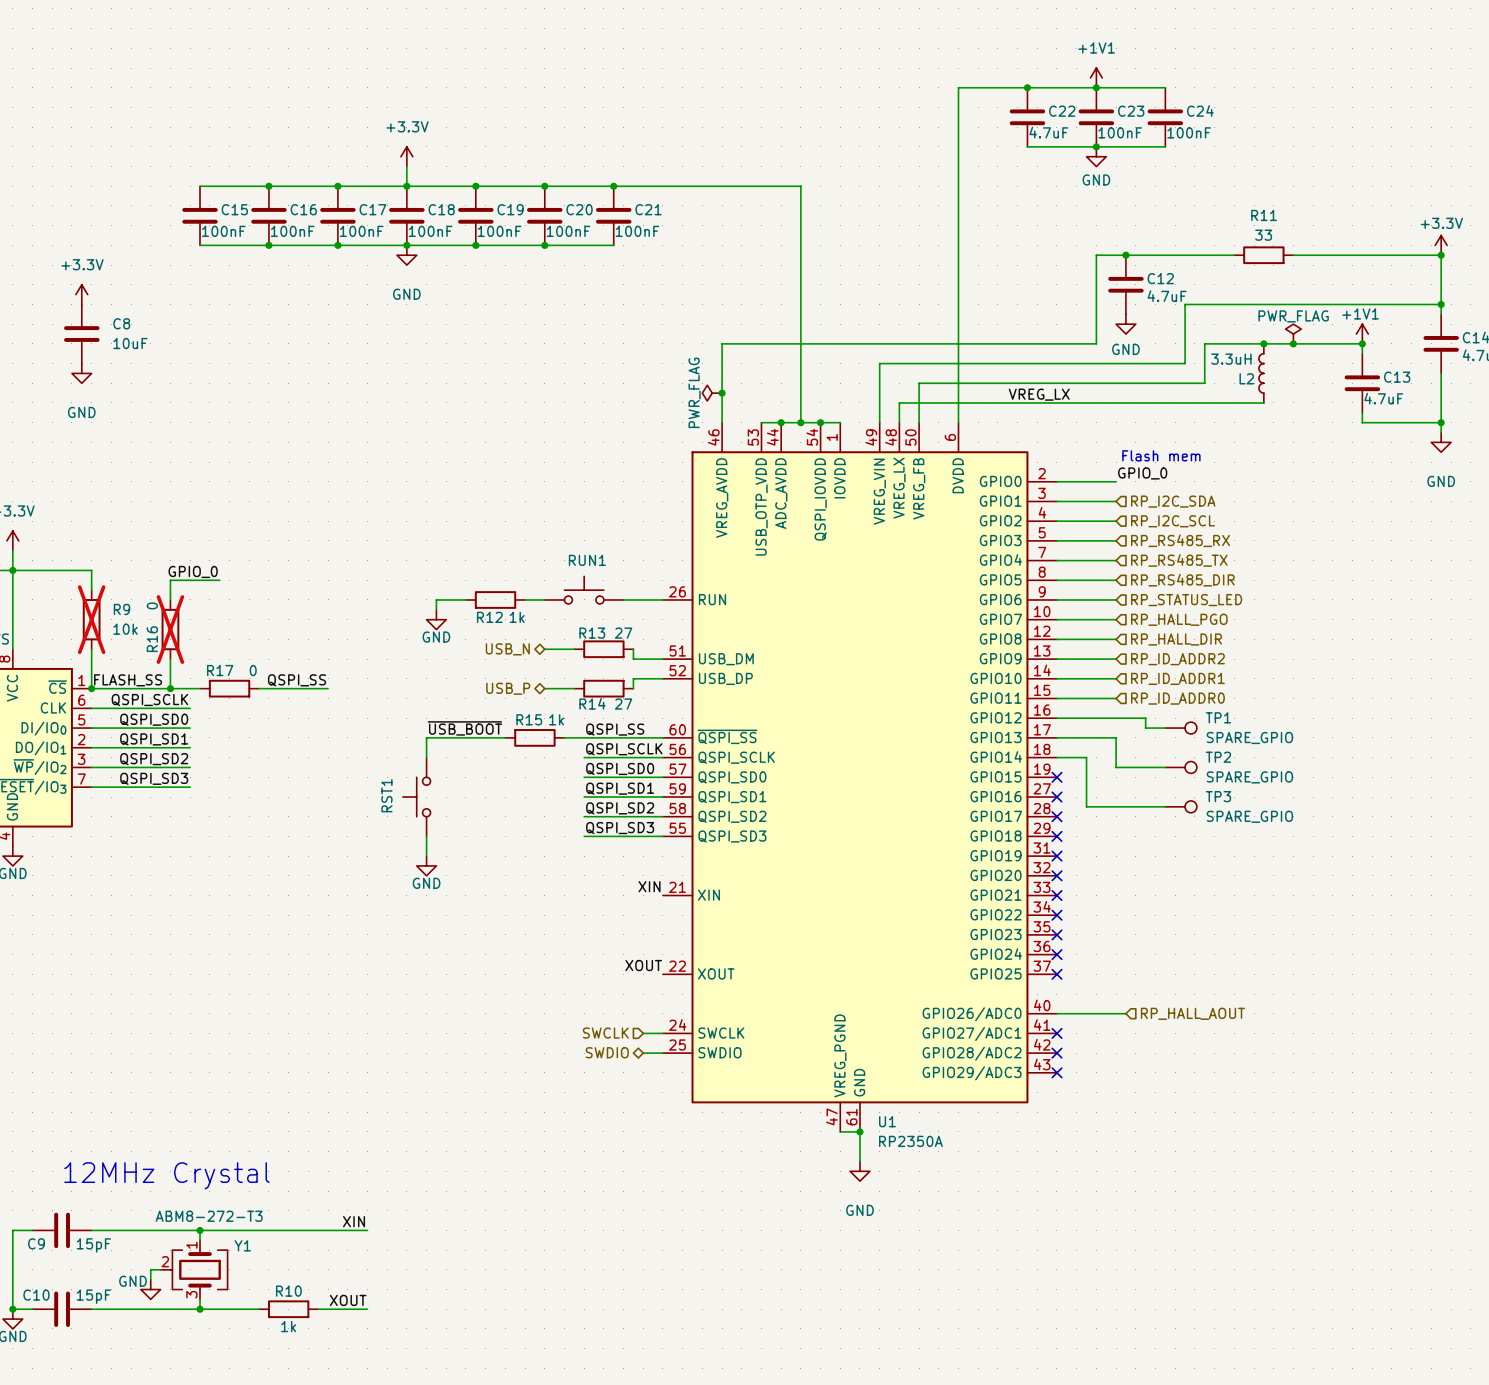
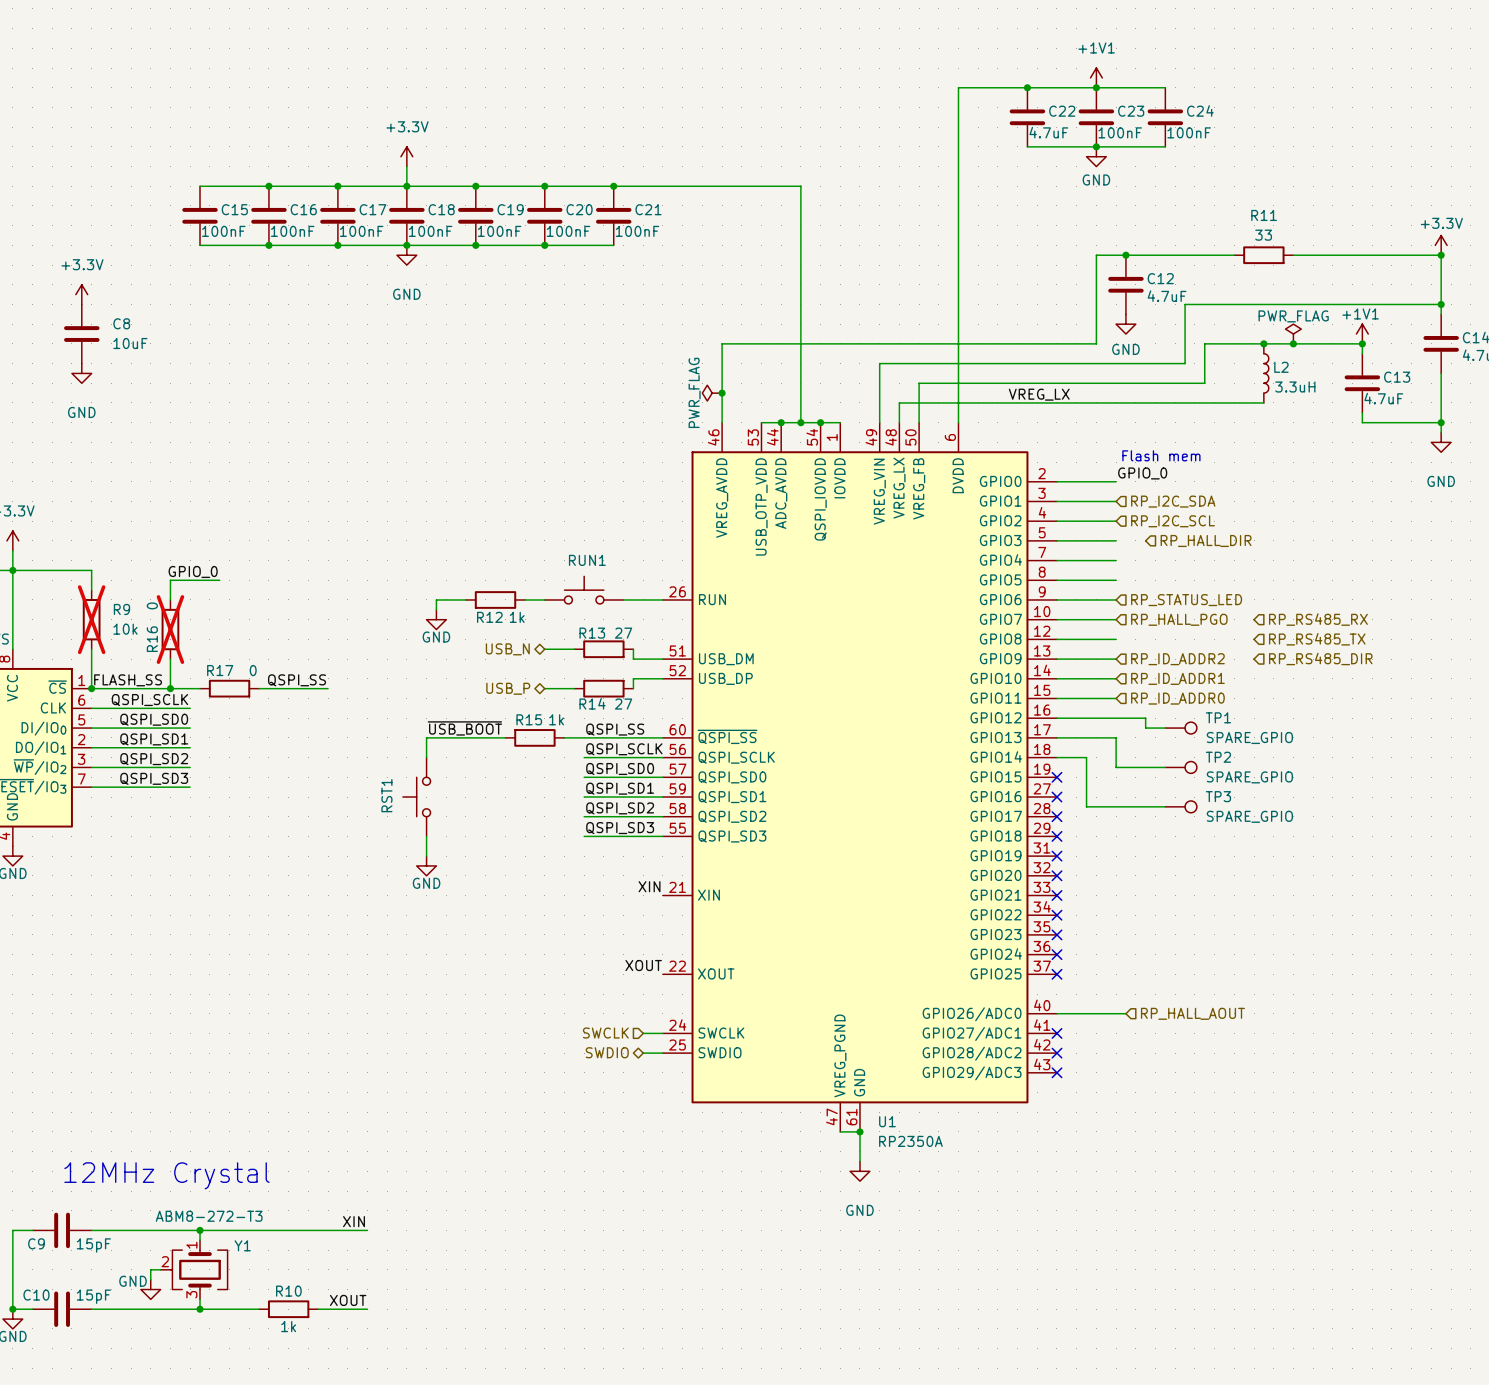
L2 rotation: 0° (1261, 373) -> 180° (1266, 373)
hierarchical label position: RP_RS485_RX (1180, 540) -> RP_RS485_RX (1318, 619)
hierarchical label position: RP_RS485_TX (1179, 560) -> RP_RS485_TX (1317, 639)
hierarchical label position: RP_RS485_DIR (1182, 580) -> RP_RS485_DIR (1320, 658)
hierarchical label position: RP_HALL_DIR (1176, 639) -> RP_HALL_DIR (1206, 540)

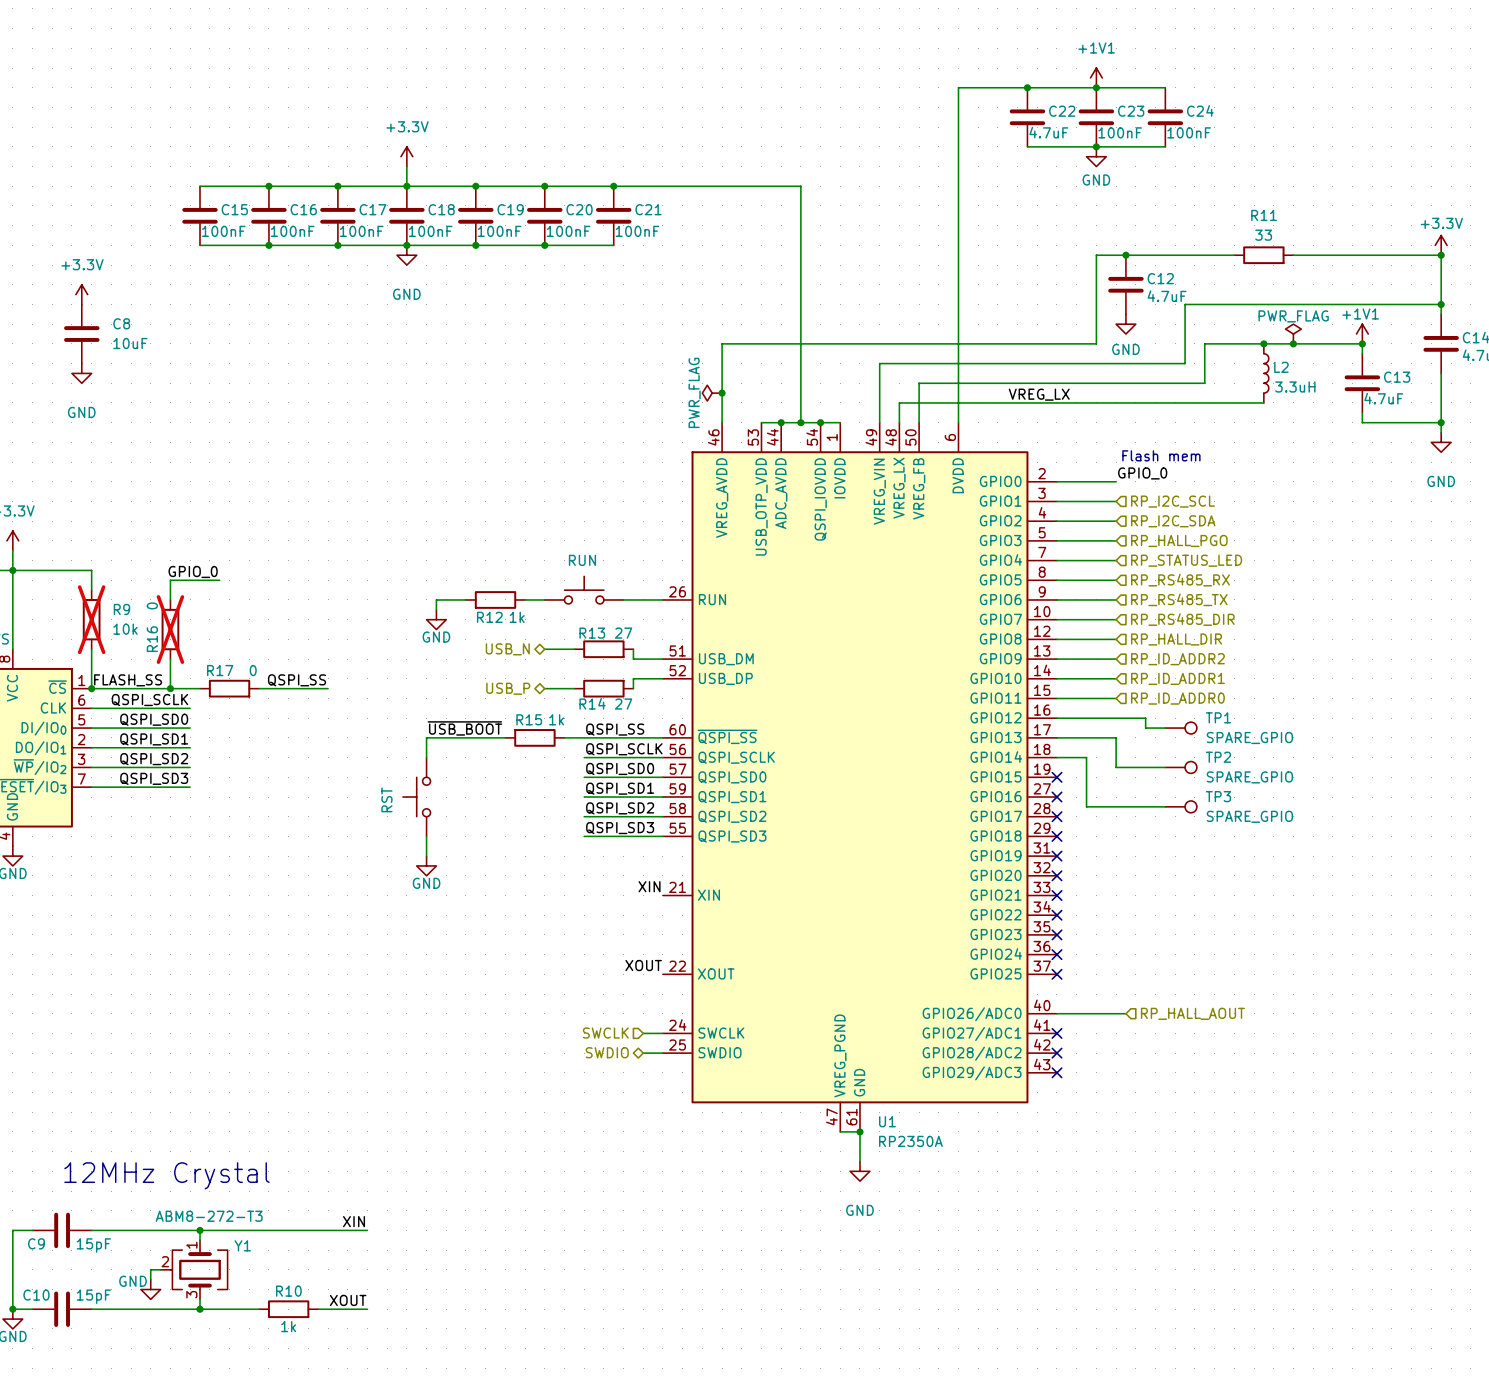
hierarchical label: RP_I2C_SDA (1173, 501) -> RP_I2C_SCL (1173, 501)
hierarchical label: RP_I2C_SCL (1173, 521) -> RP_I2C_SDA (1173, 521)
hierarchical label: none -> RP_HALL_PGO (1179, 540)
hierarchical label position: RP_HALL_DIR (1206, 540) -> RP_HALL_DIR (1176, 639)
RUN1 name: RUN1 (587, 560) -> RUN (582, 560)
hierarchical label: none -> RP_STATUS_LED (1186, 560)
hierarchical label: RP_STATUS_LED (1186, 600) -> RP_RS485_TX (1179, 599)
hierarchical label: RP_HALL_PGO (1179, 619) -> RP_RS485_DIR (1182, 619)
hierarchical label position: RP_RS485_RX (1318, 619) -> RP_RS485_RX (1180, 580)
hierarchical label: RP_RS485_TX (1317, 639) -> none
hierarchical label: RP_RS485_DIR (1320, 658) -> none
RST1 name: RST1 (386, 795) -> RST (386, 799)

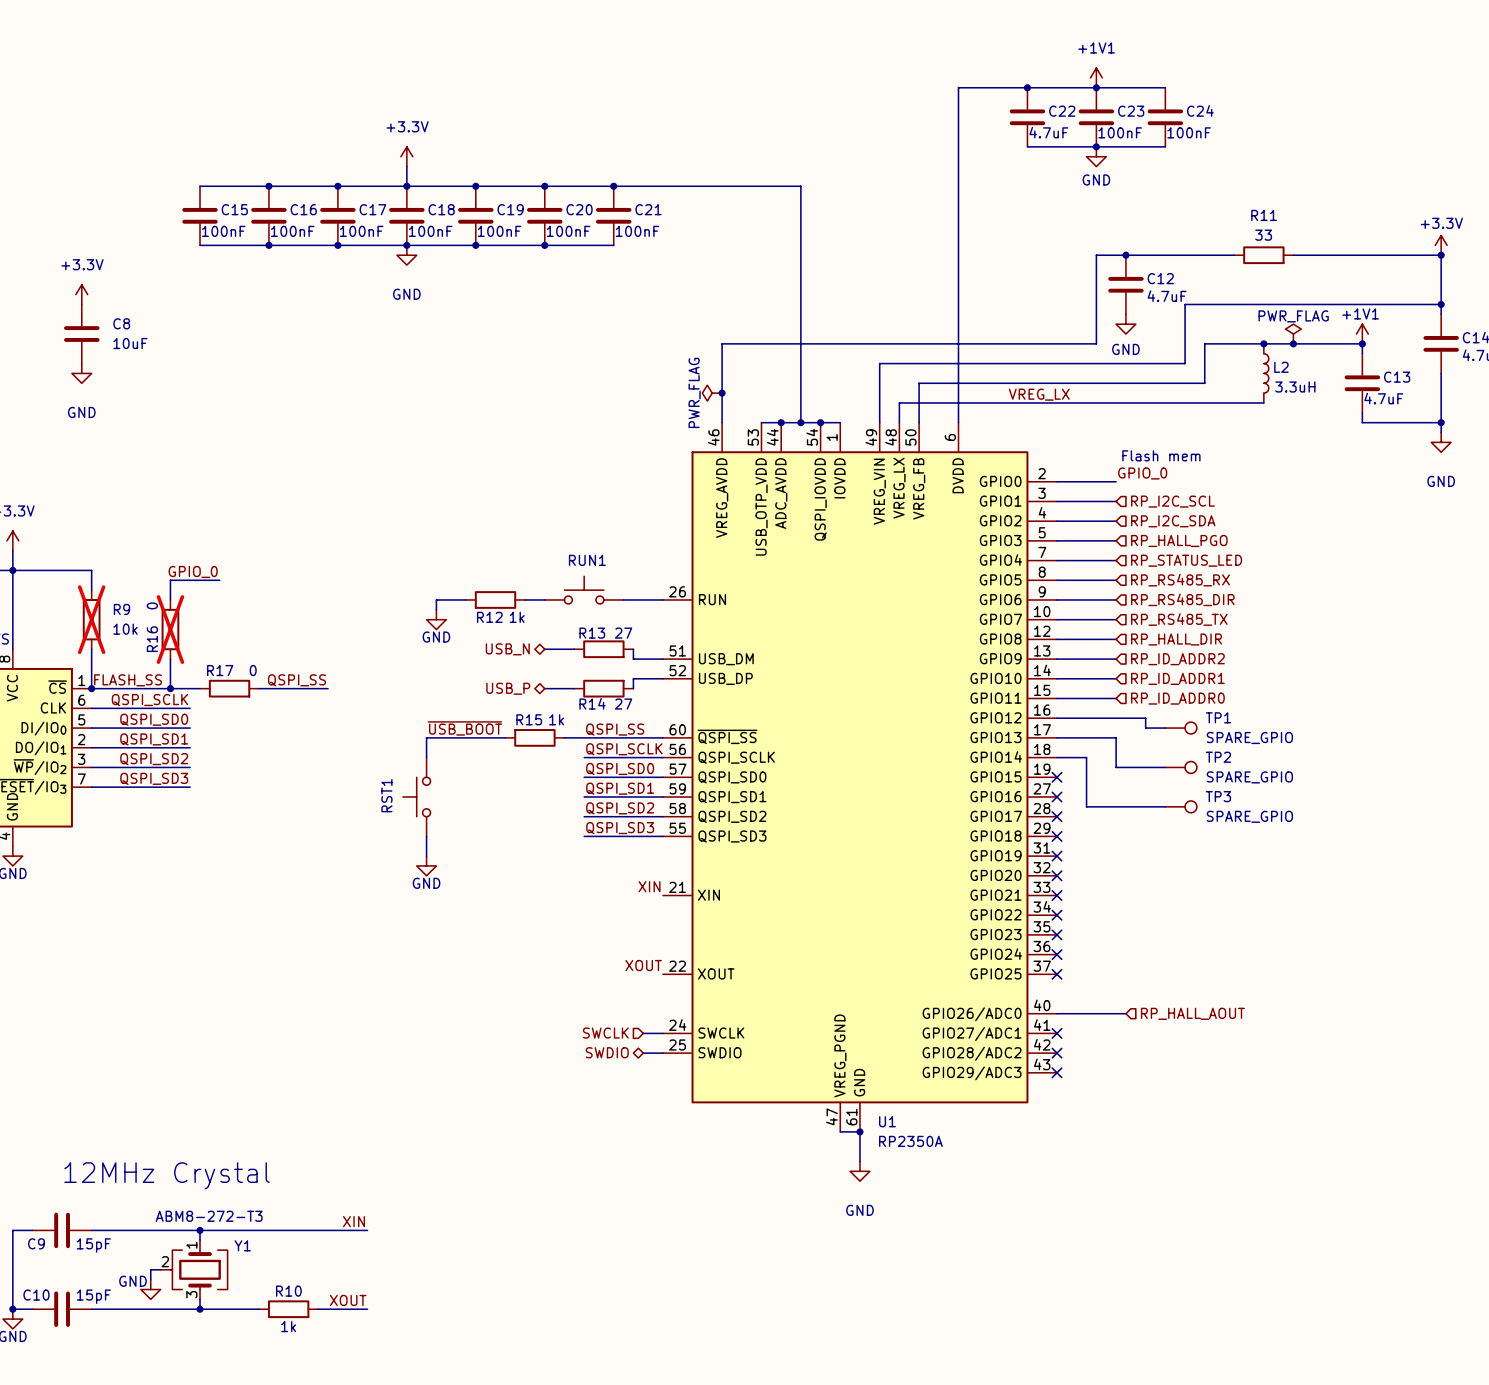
RUN name: RUN (582, 560) -> RUN1 (587, 560)
hierarchical label: RP_RS485_TX (1179, 599) -> RP_RS485_DIR (1182, 599)
hierarchical label: RP_RS485_DIR (1182, 619) -> RP_RS485_TX (1179, 619)
RST name: RST (386, 799) -> RST1 (386, 795)

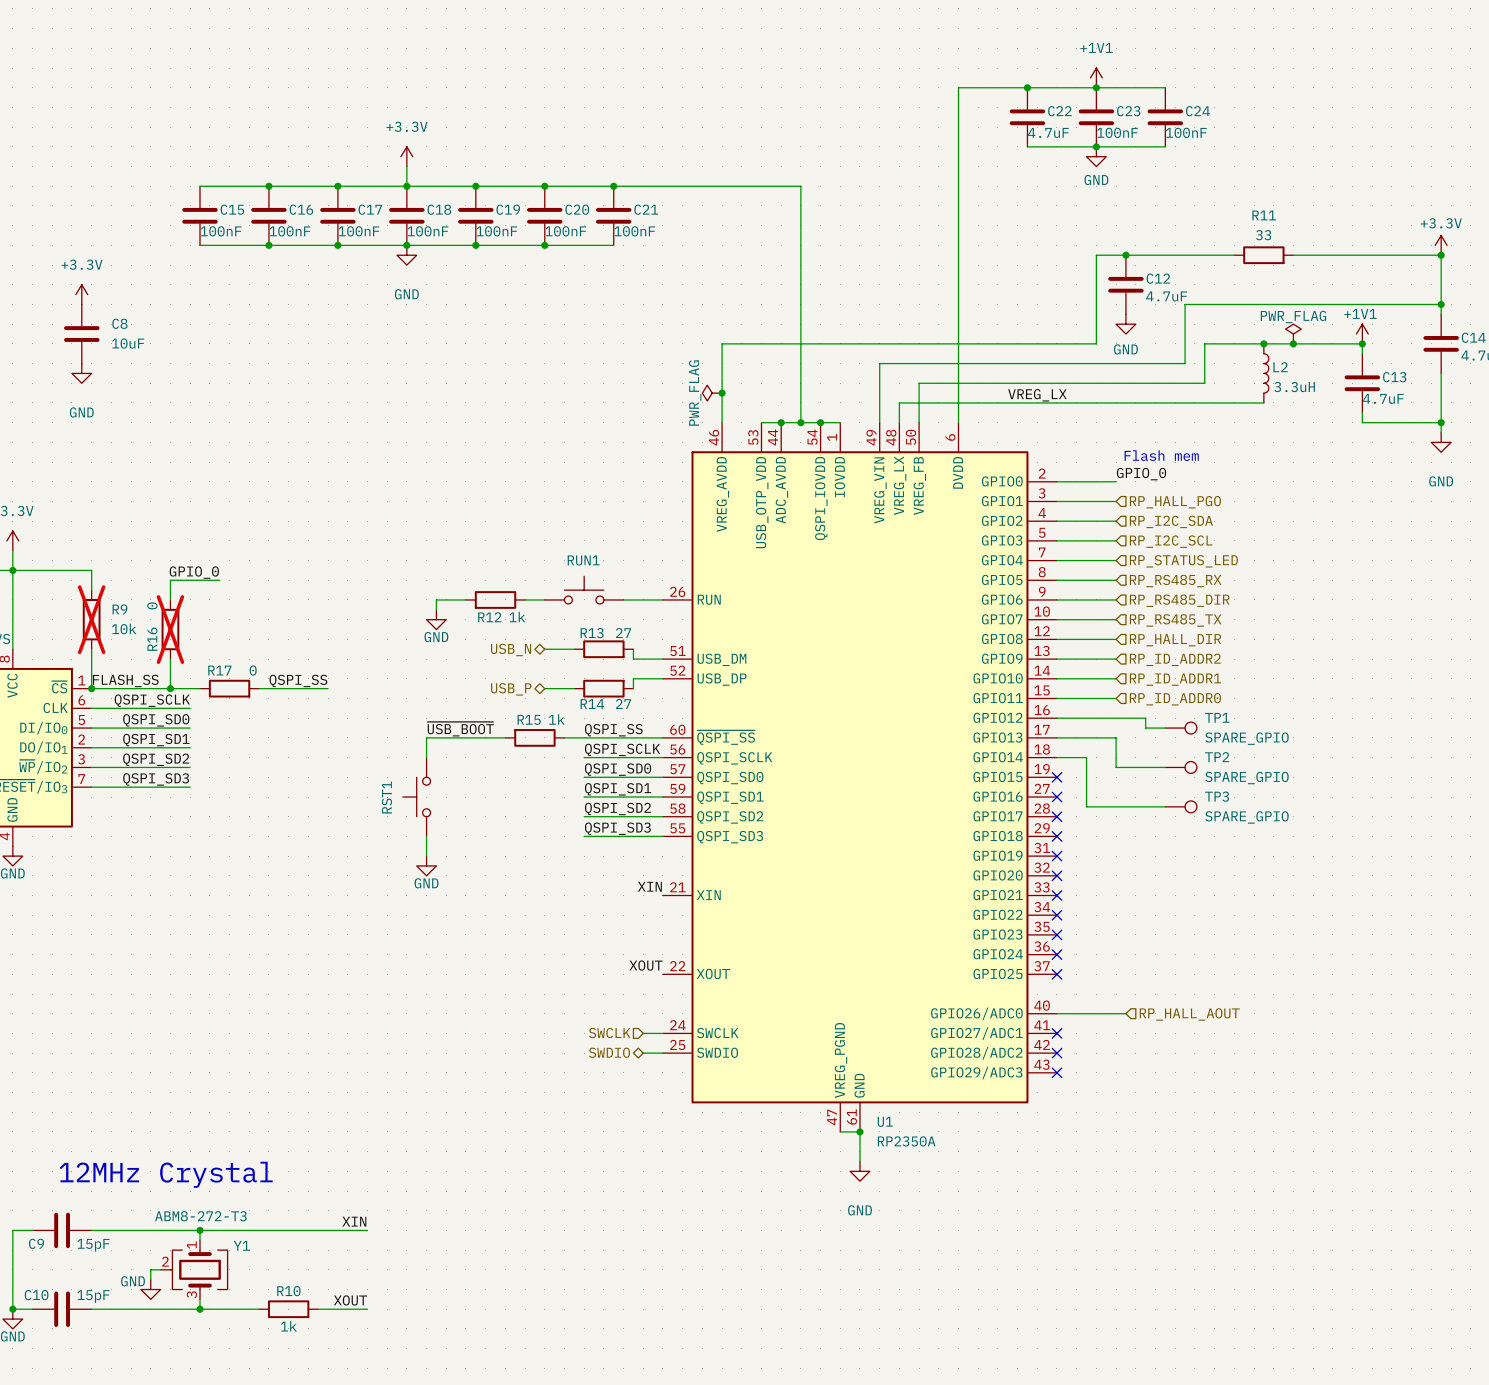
hierarchical label: RP_I2C_SCL (1173, 501) -> RP_HALL_PGO (1175, 502)
hierarchical label: RP_HALL_PGO (1179, 540) -> RP_I2C_SCL (1171, 541)

